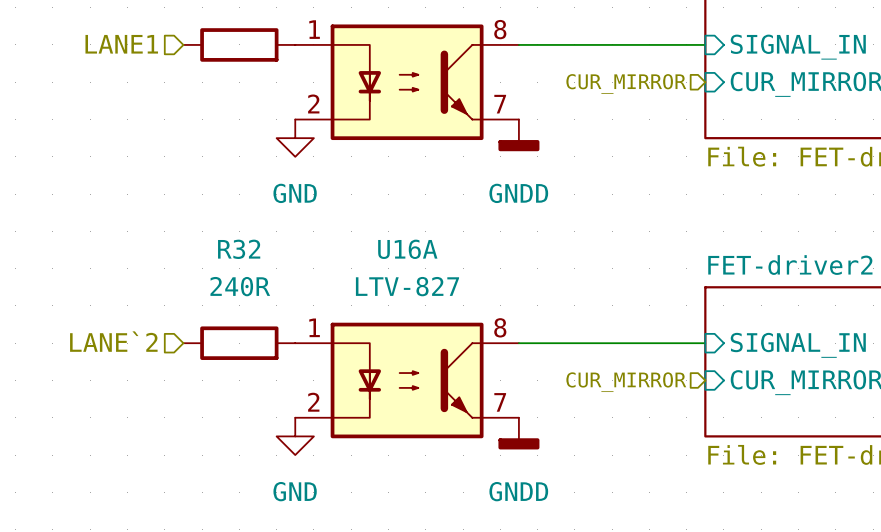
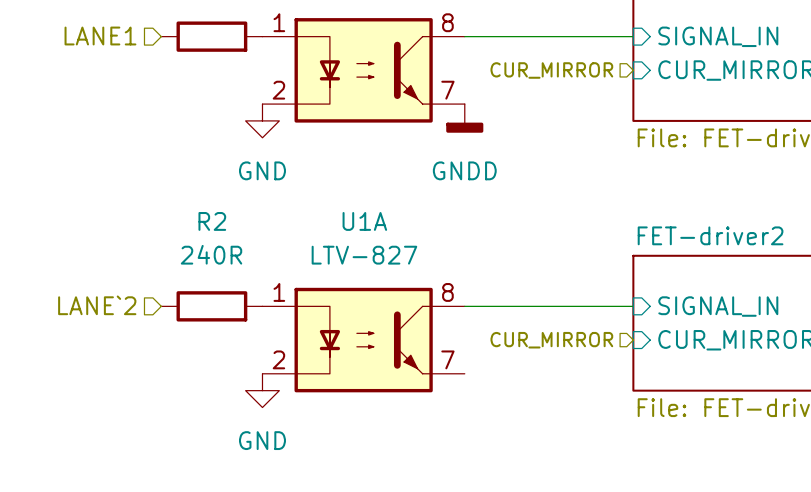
R32 name: R32 (239, 249) -> R2 (212, 221)
U16A name: U16A (407, 249) -> U1A (364, 221)
power symbol: GNDD (518, 433) -> none

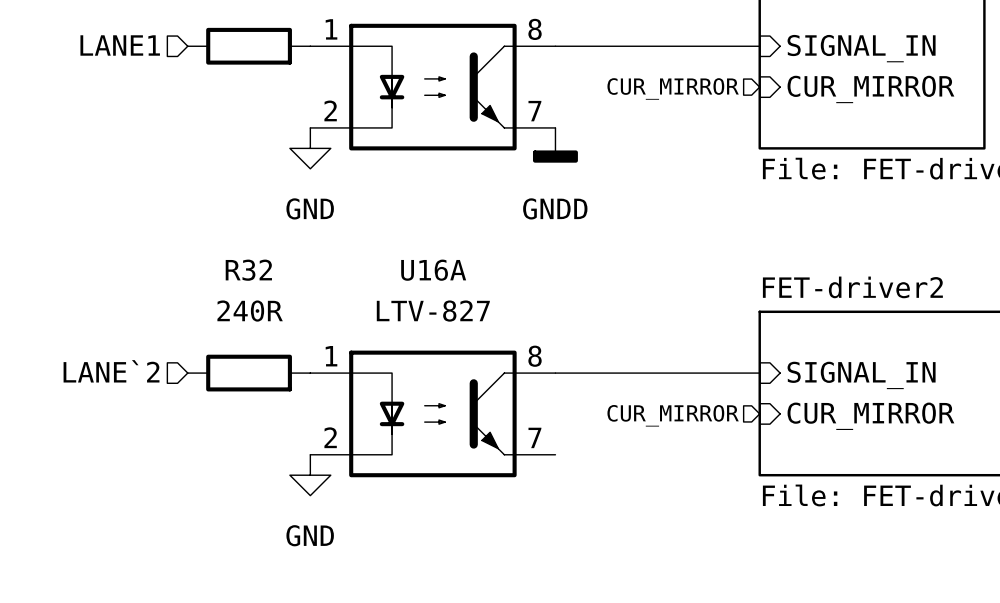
R2 name: R2 (212, 221) -> R32 (248, 270)
U1A name: U1A (364, 221) -> U16A (433, 270)

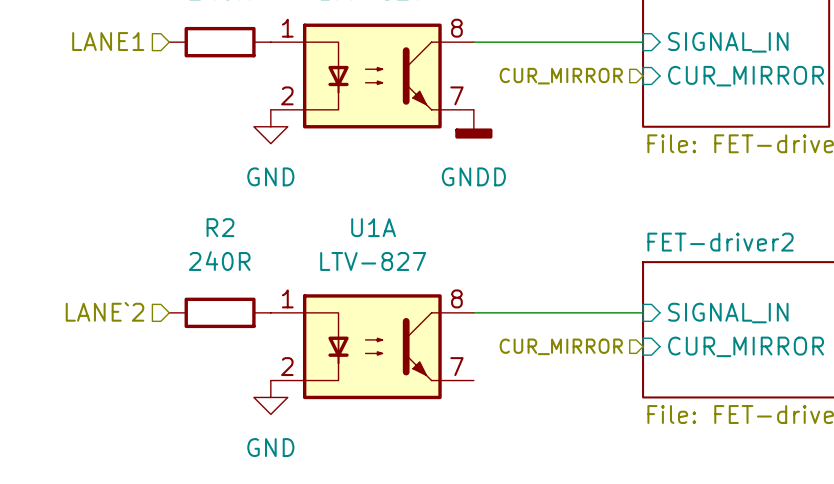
R32 name: R32 (248, 270) -> R2 (220, 227)
U16A name: U16A (433, 270) -> U1A (373, 227)

